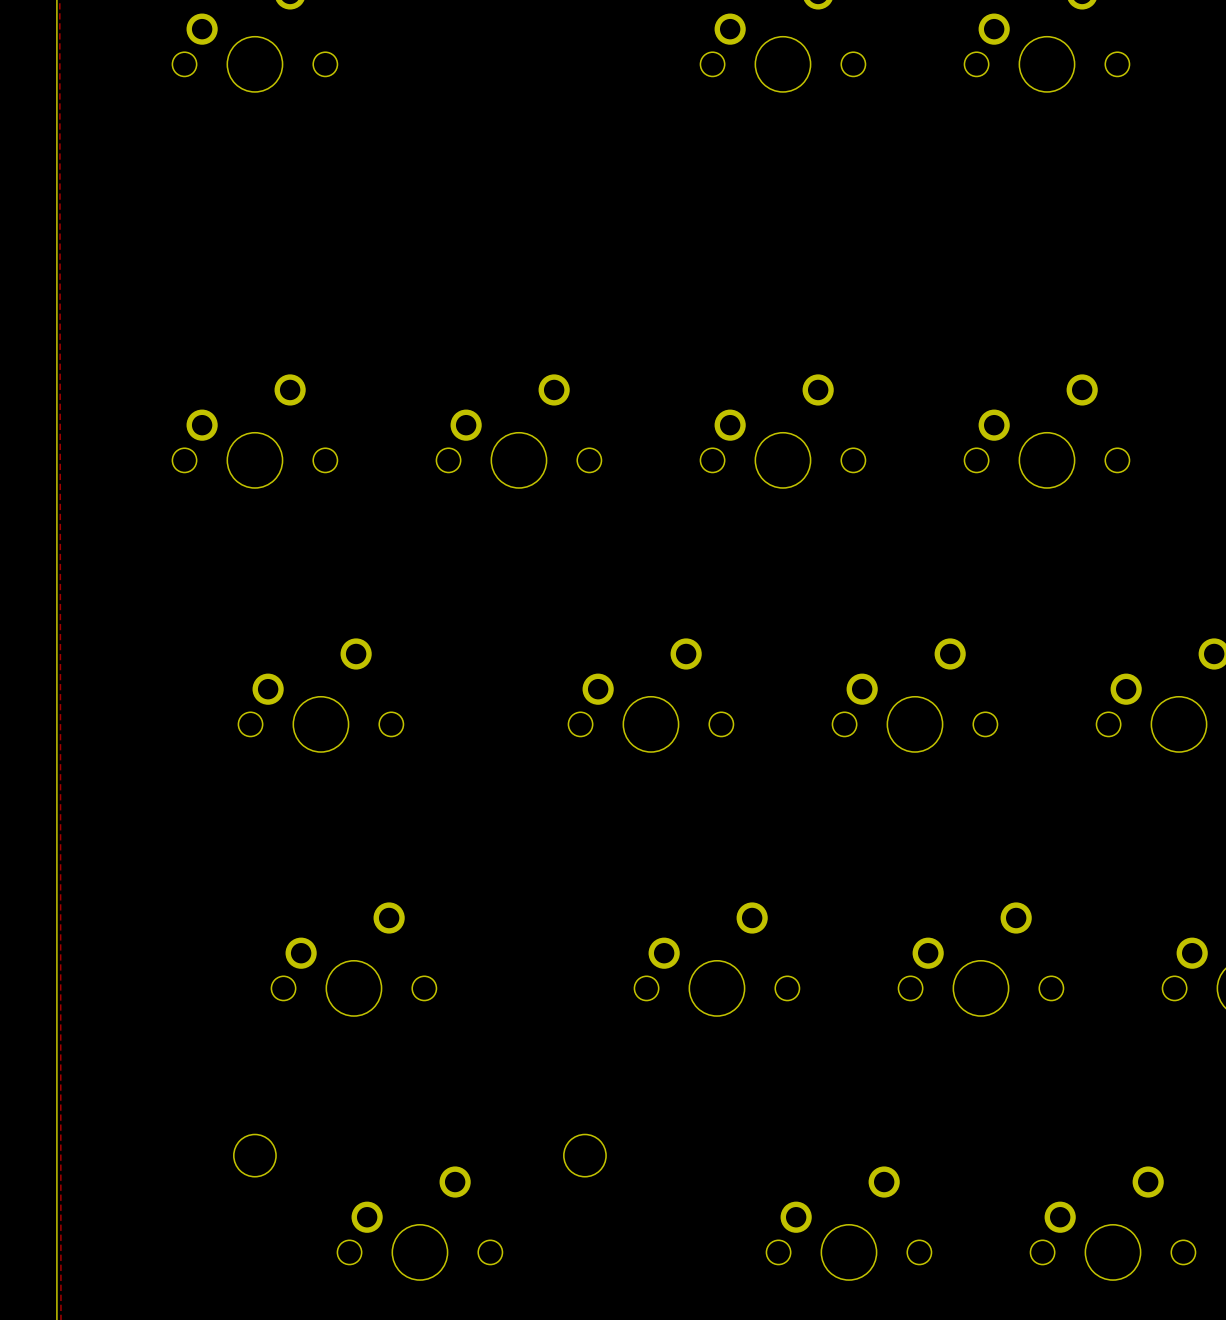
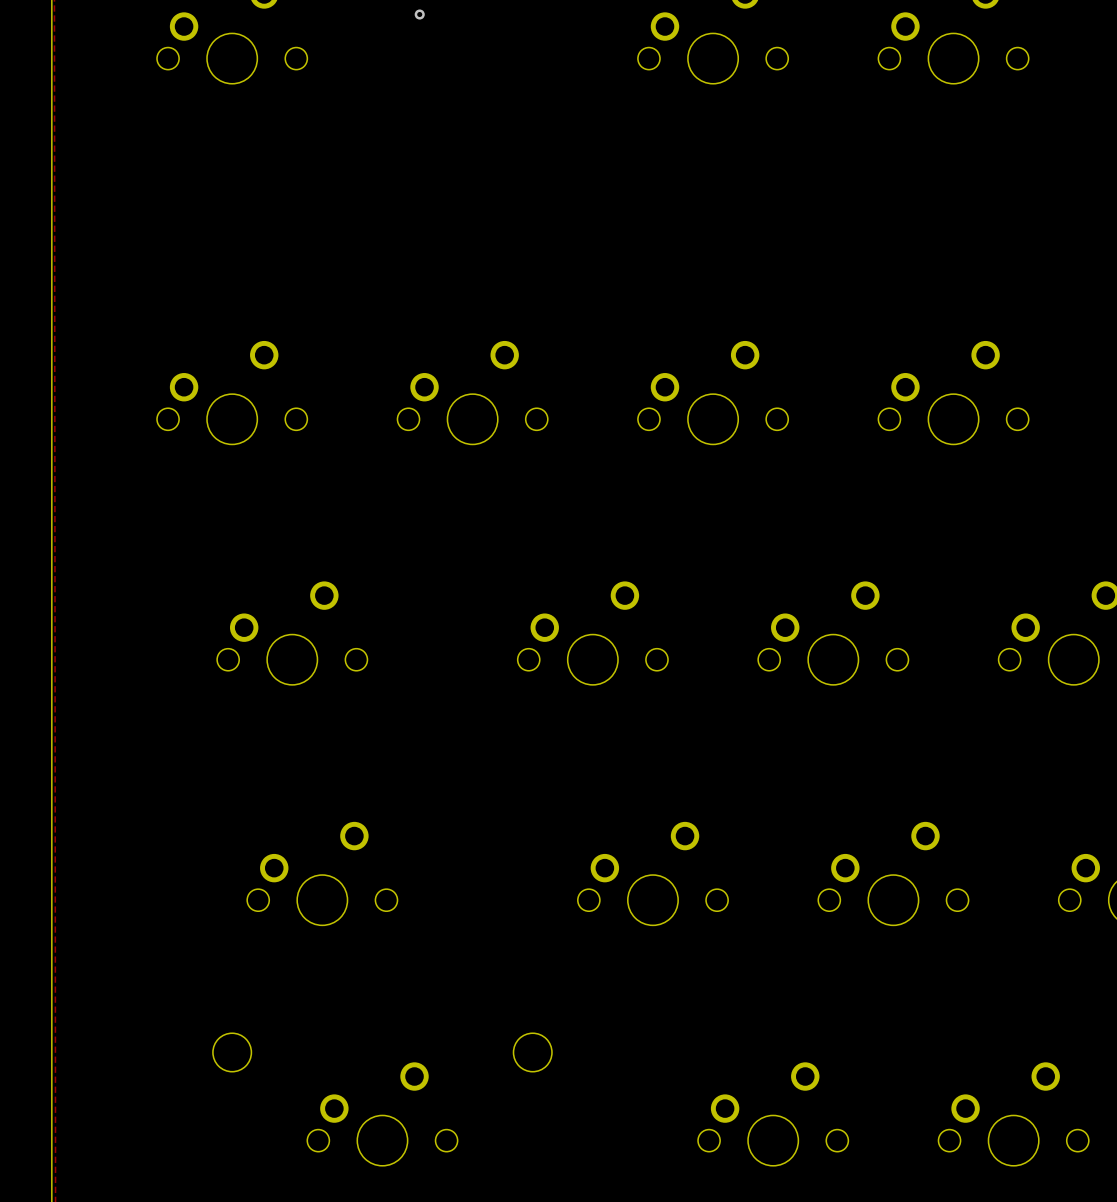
via: none -> (419, 14)

